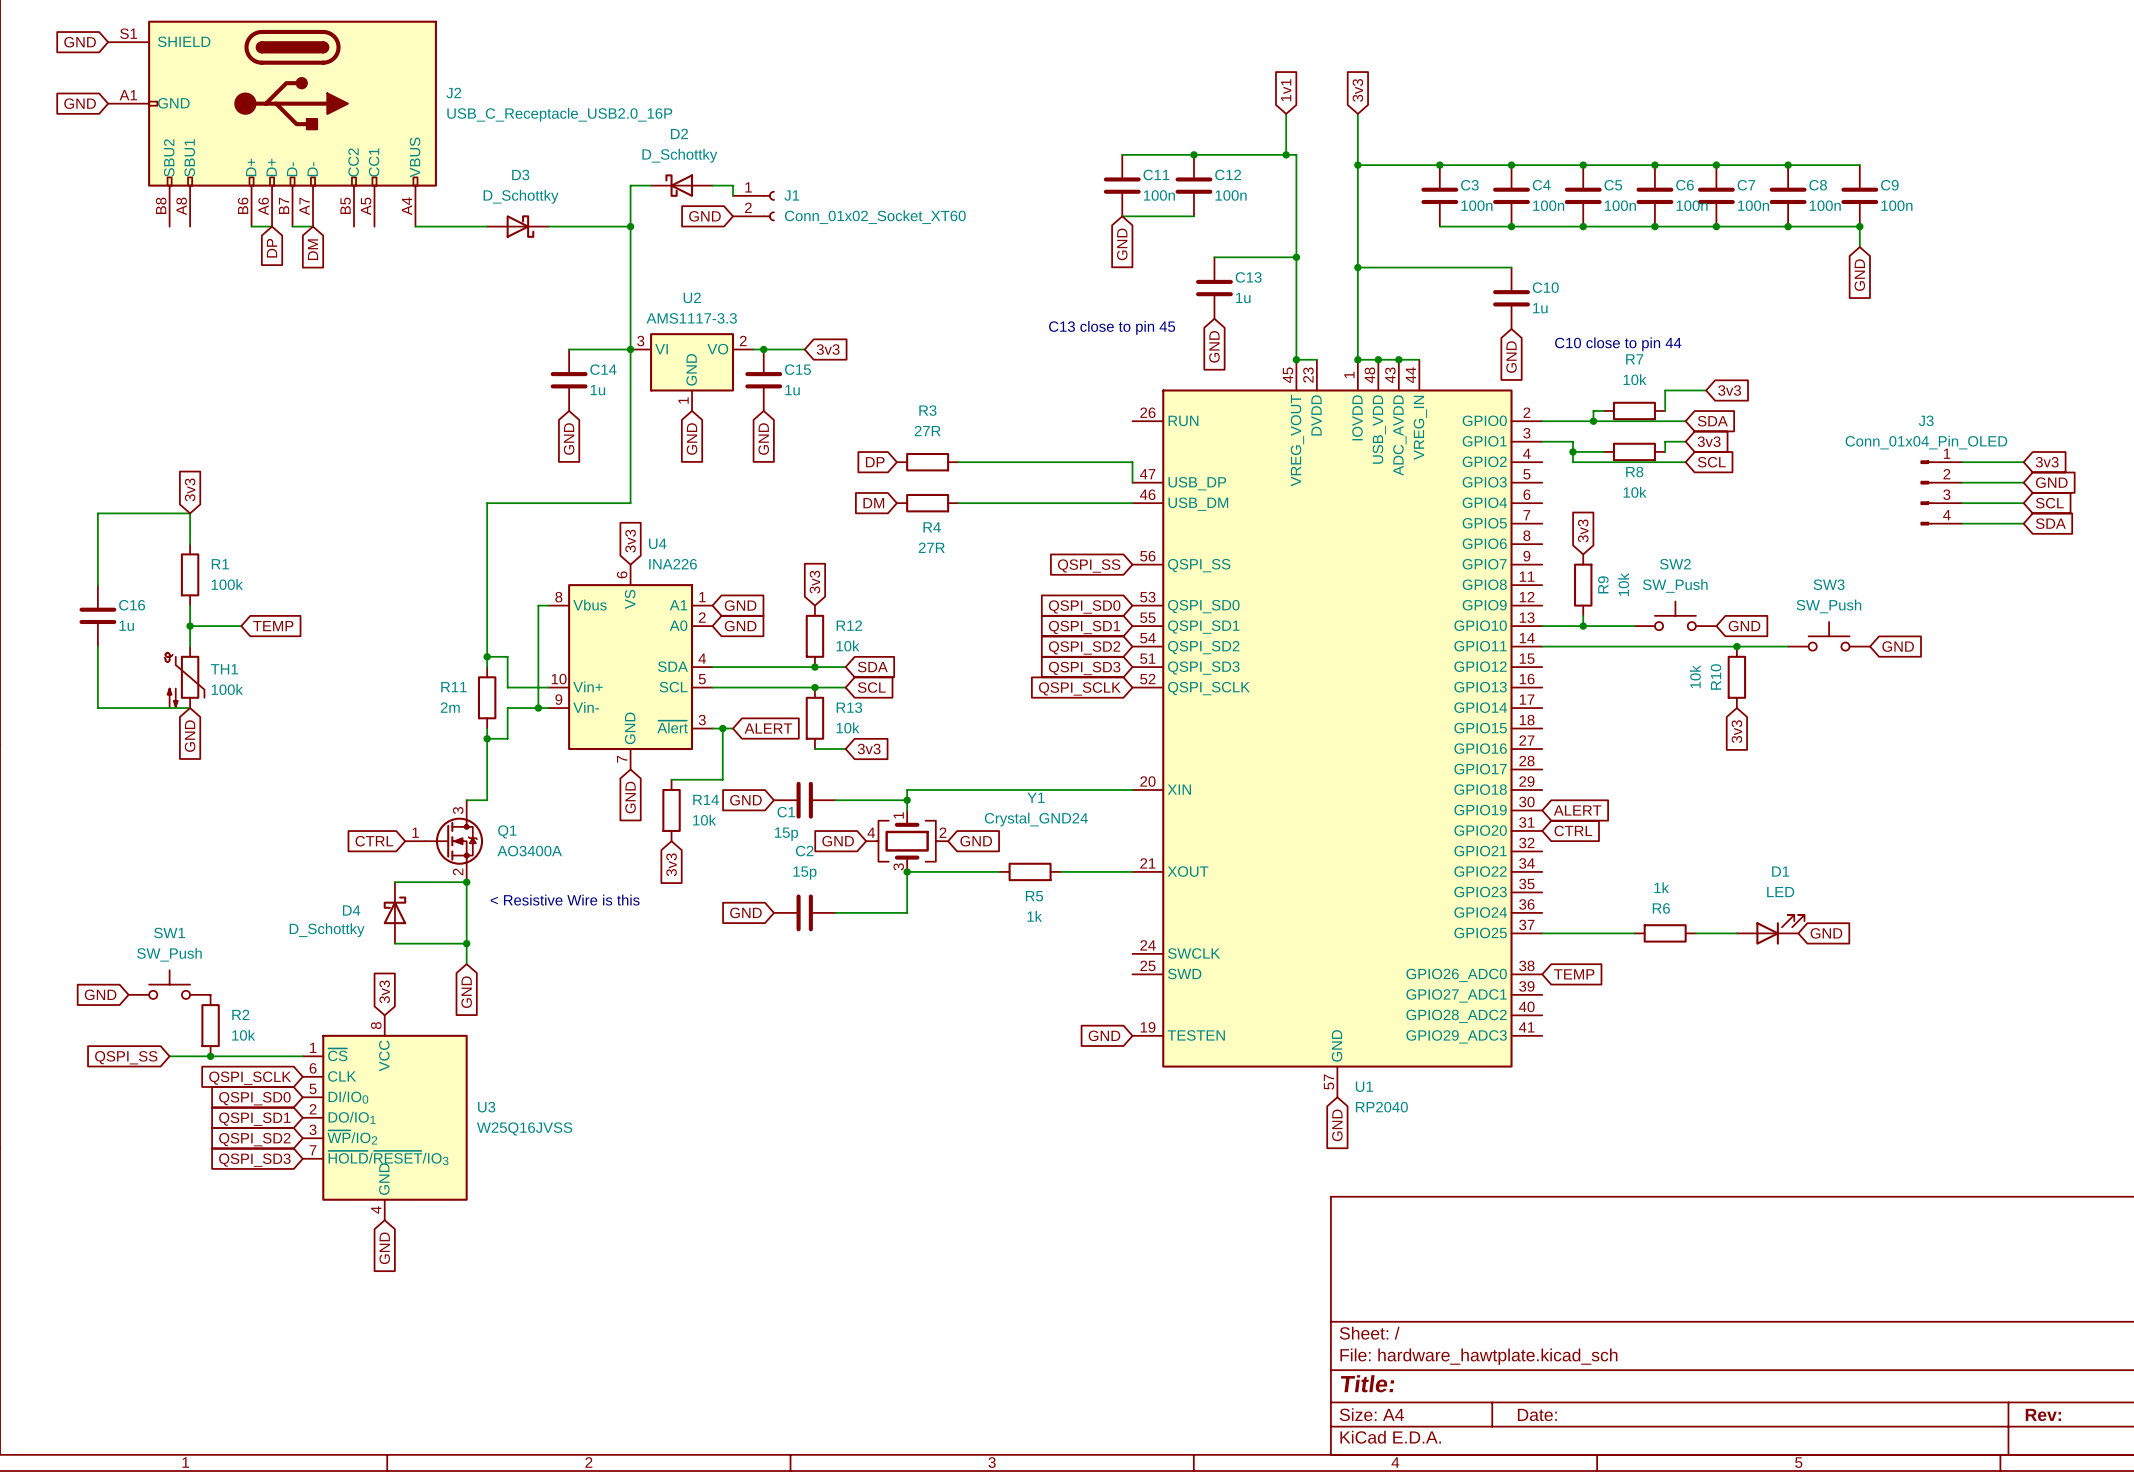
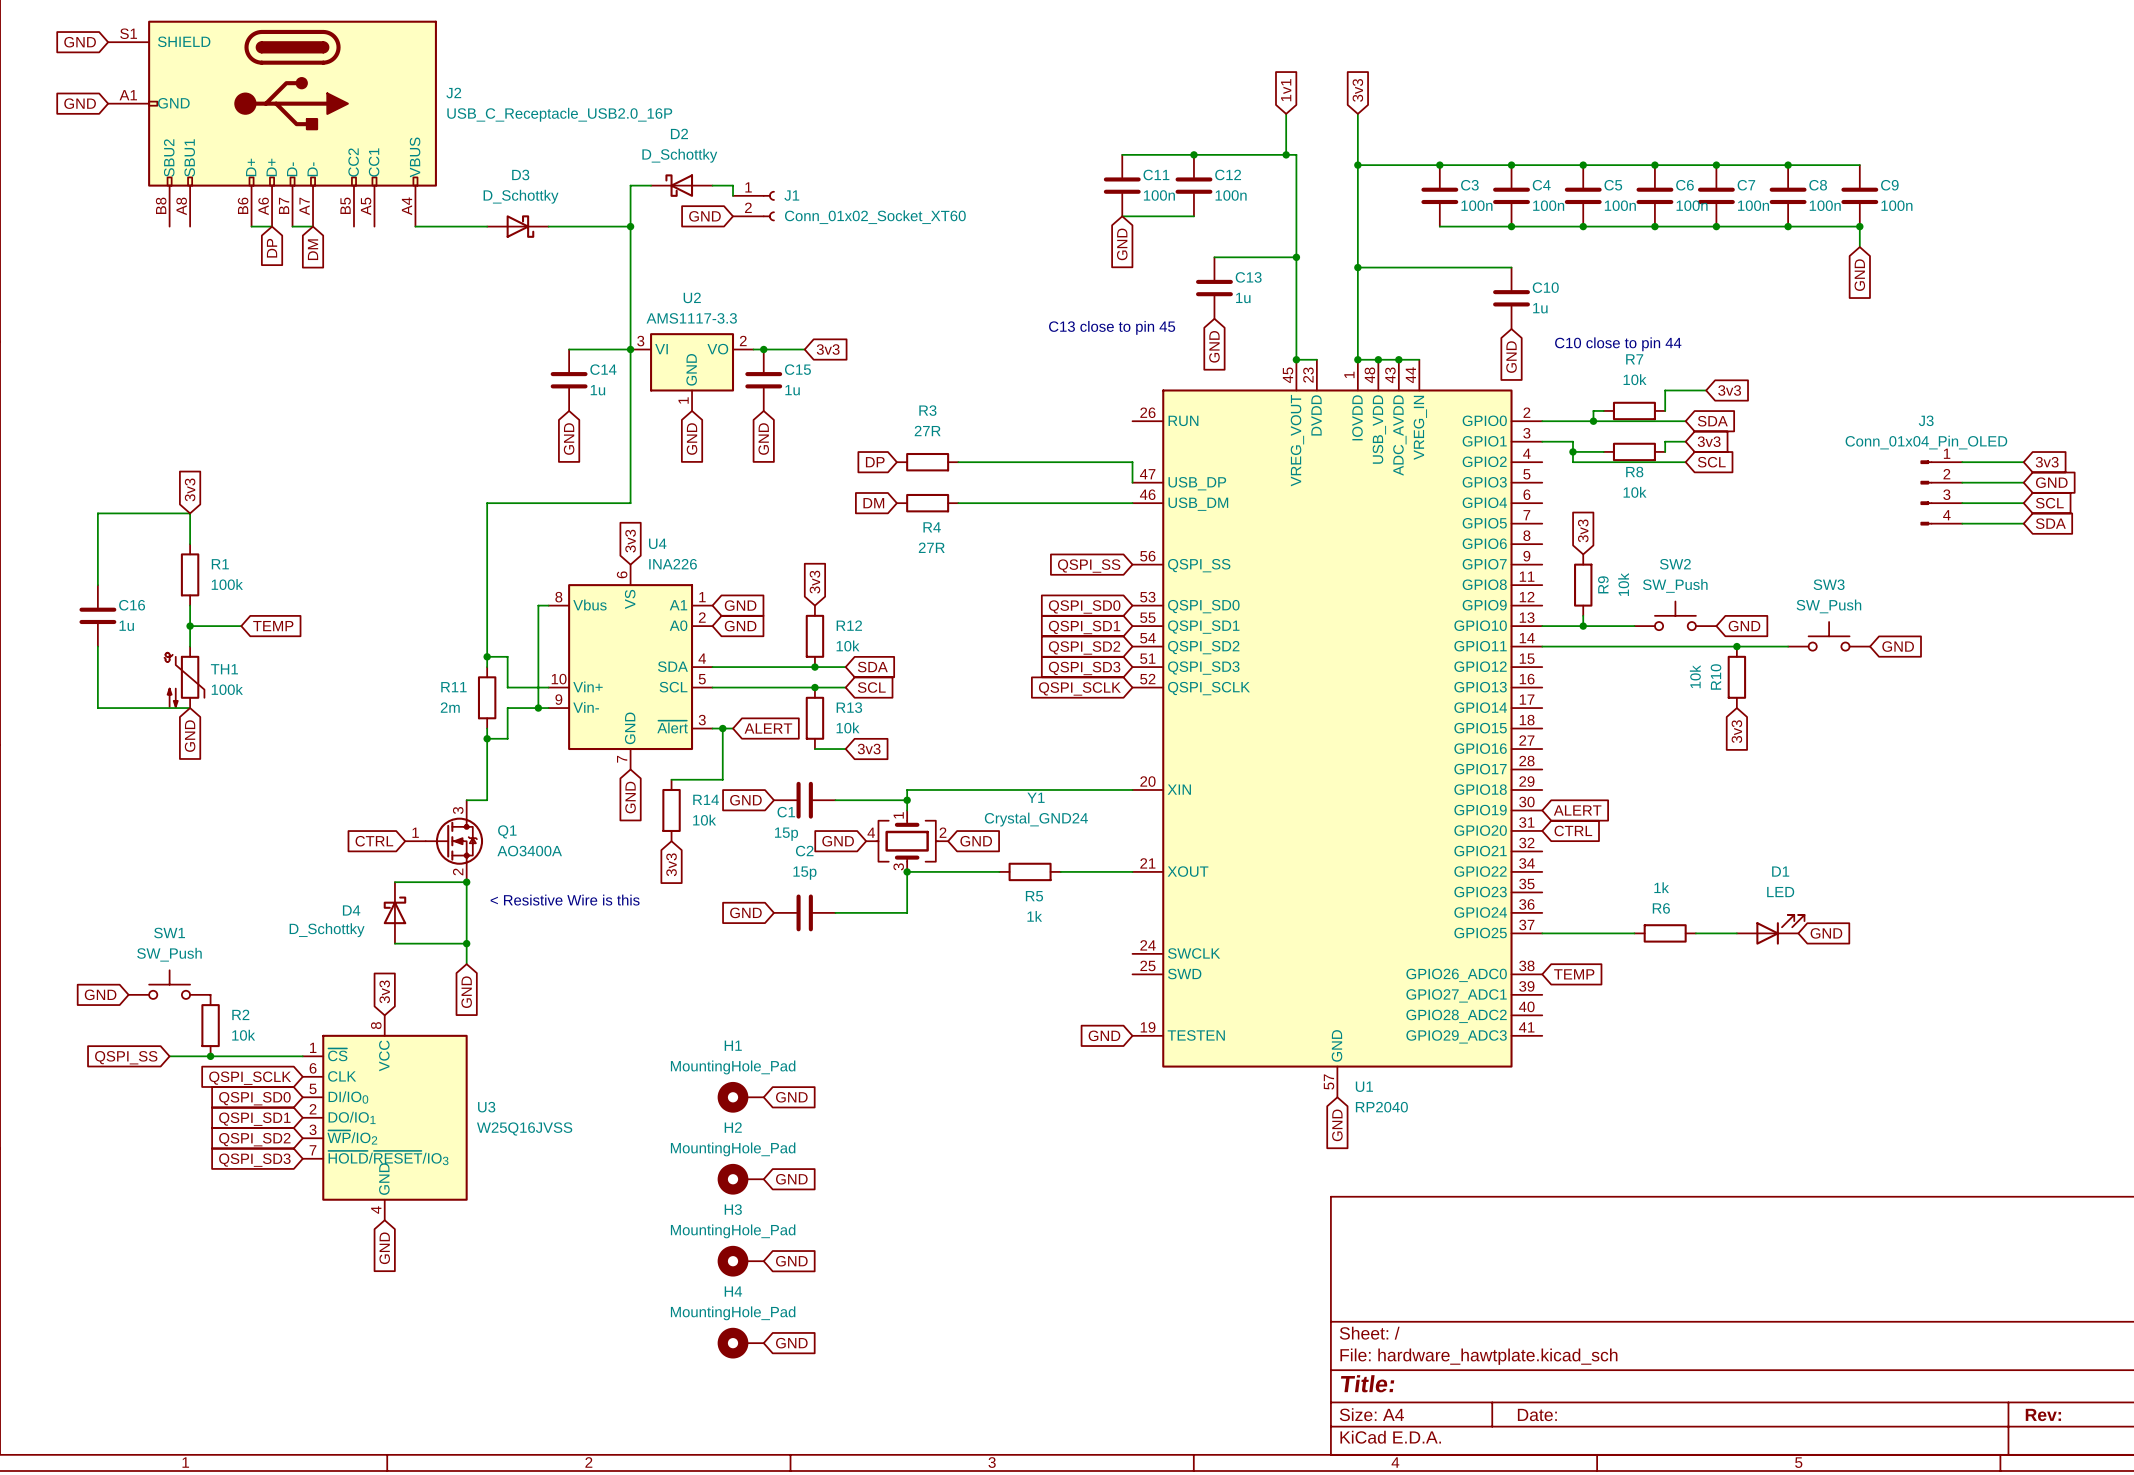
H1: none -> MountingHole_Pad (740, 1097)
global label: none -> GND (791, 1097)
H2: none -> MountingHole_Pad (740, 1179)
global label: none -> GND (791, 1179)
H3: none -> MountingHole_Pad (740, 1261)
global label: none -> GND (791, 1261)
H4: none -> MountingHole_Pad (740, 1343)
global label: none -> GND (791, 1343)

